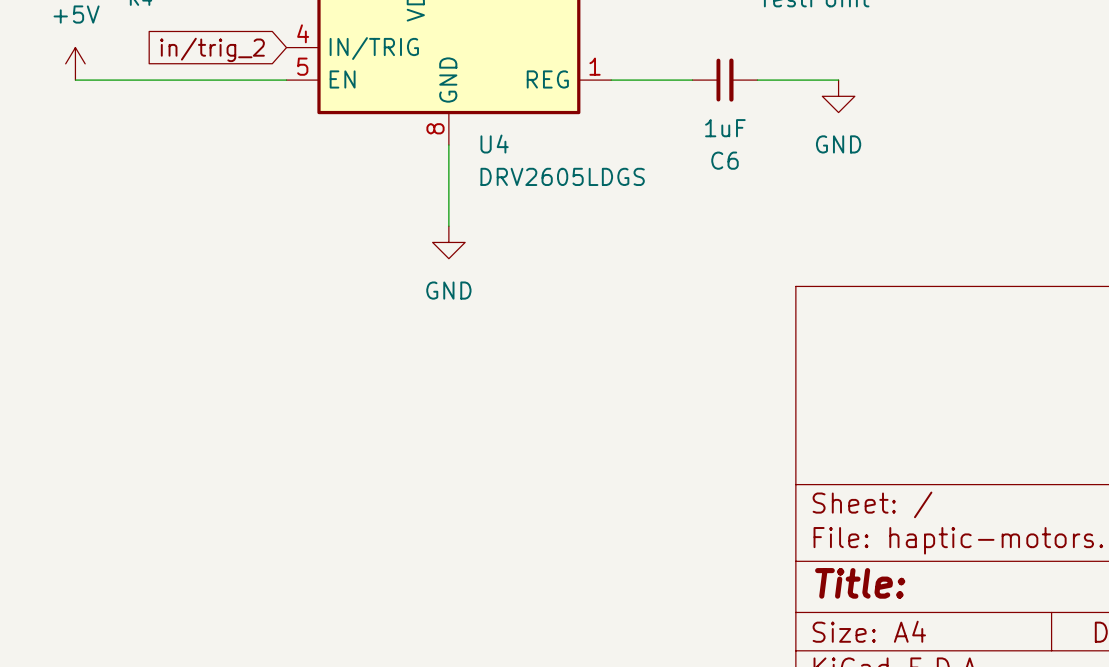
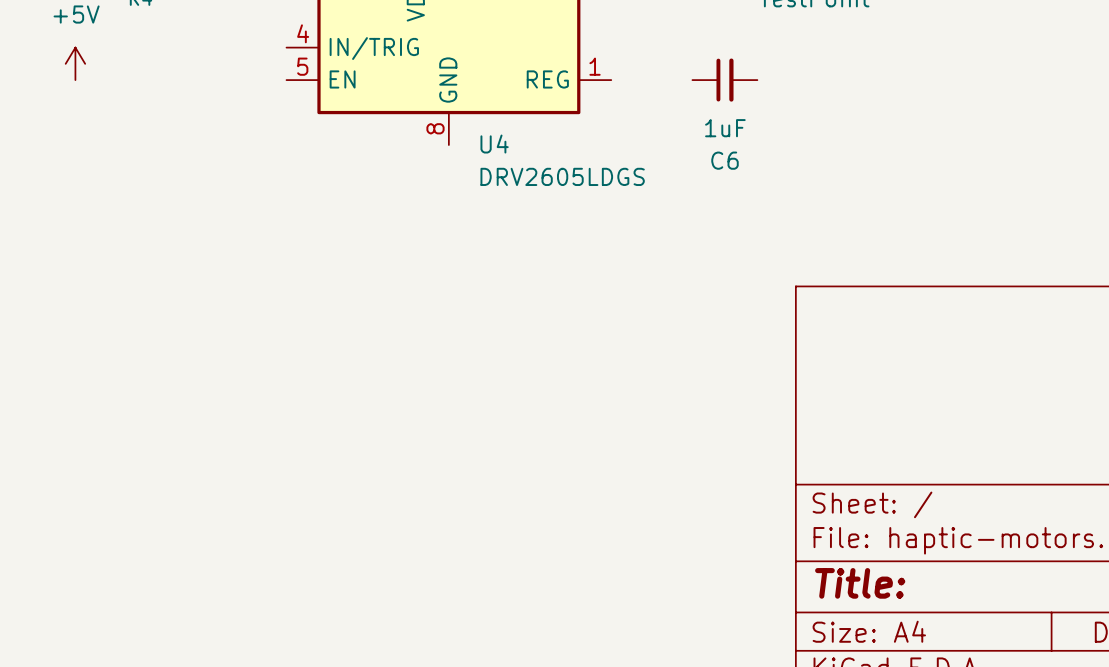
global label: in/trig_2 (212, 49) -> none
wire: (75, 80) (286, 80) -> none
wire: (611, 80) (692, 80) -> none
wire: (757, 80) (838, 80) -> none
power symbol: GND (838, 96) -> none
wire: (448, 145) (448, 226) -> none
power symbol: GND (448, 242) -> none

